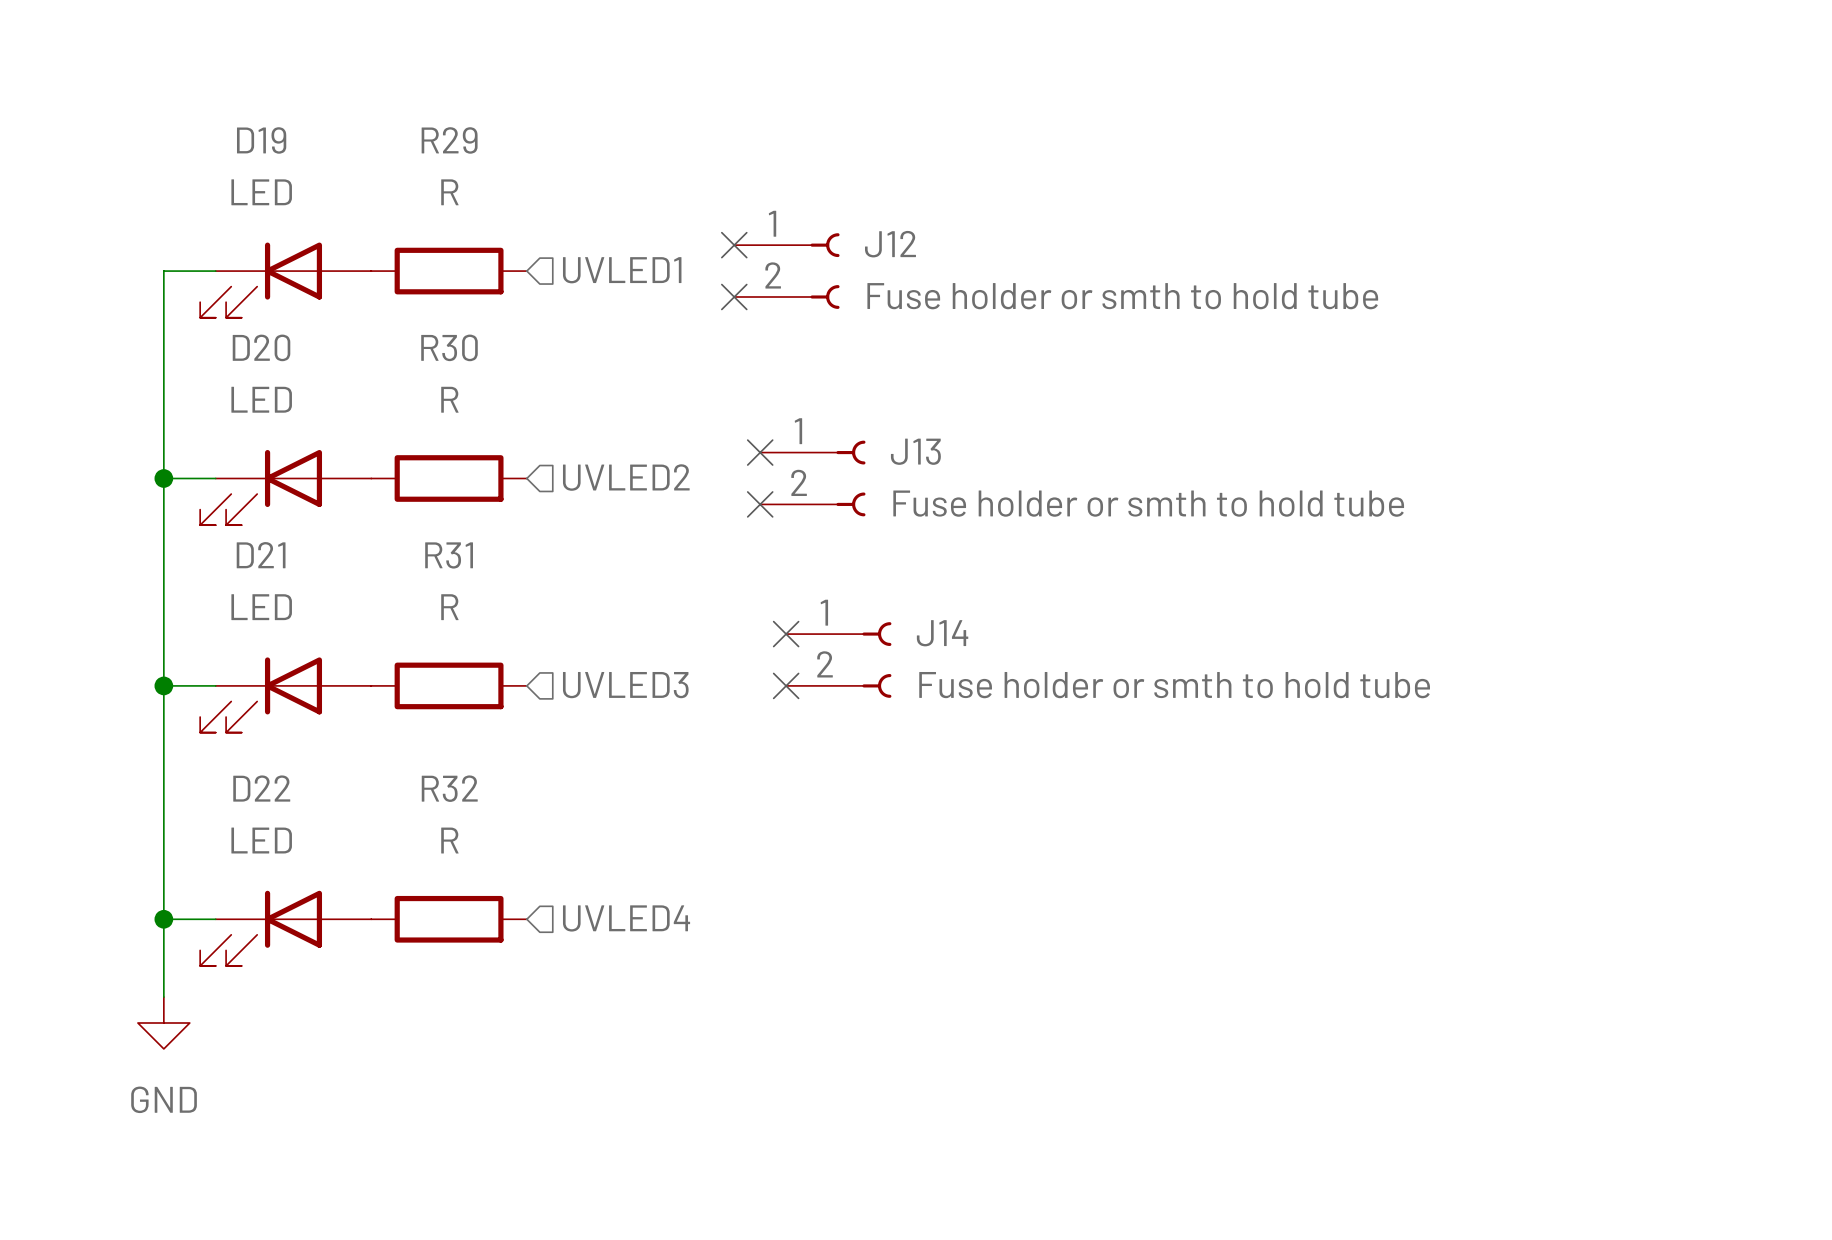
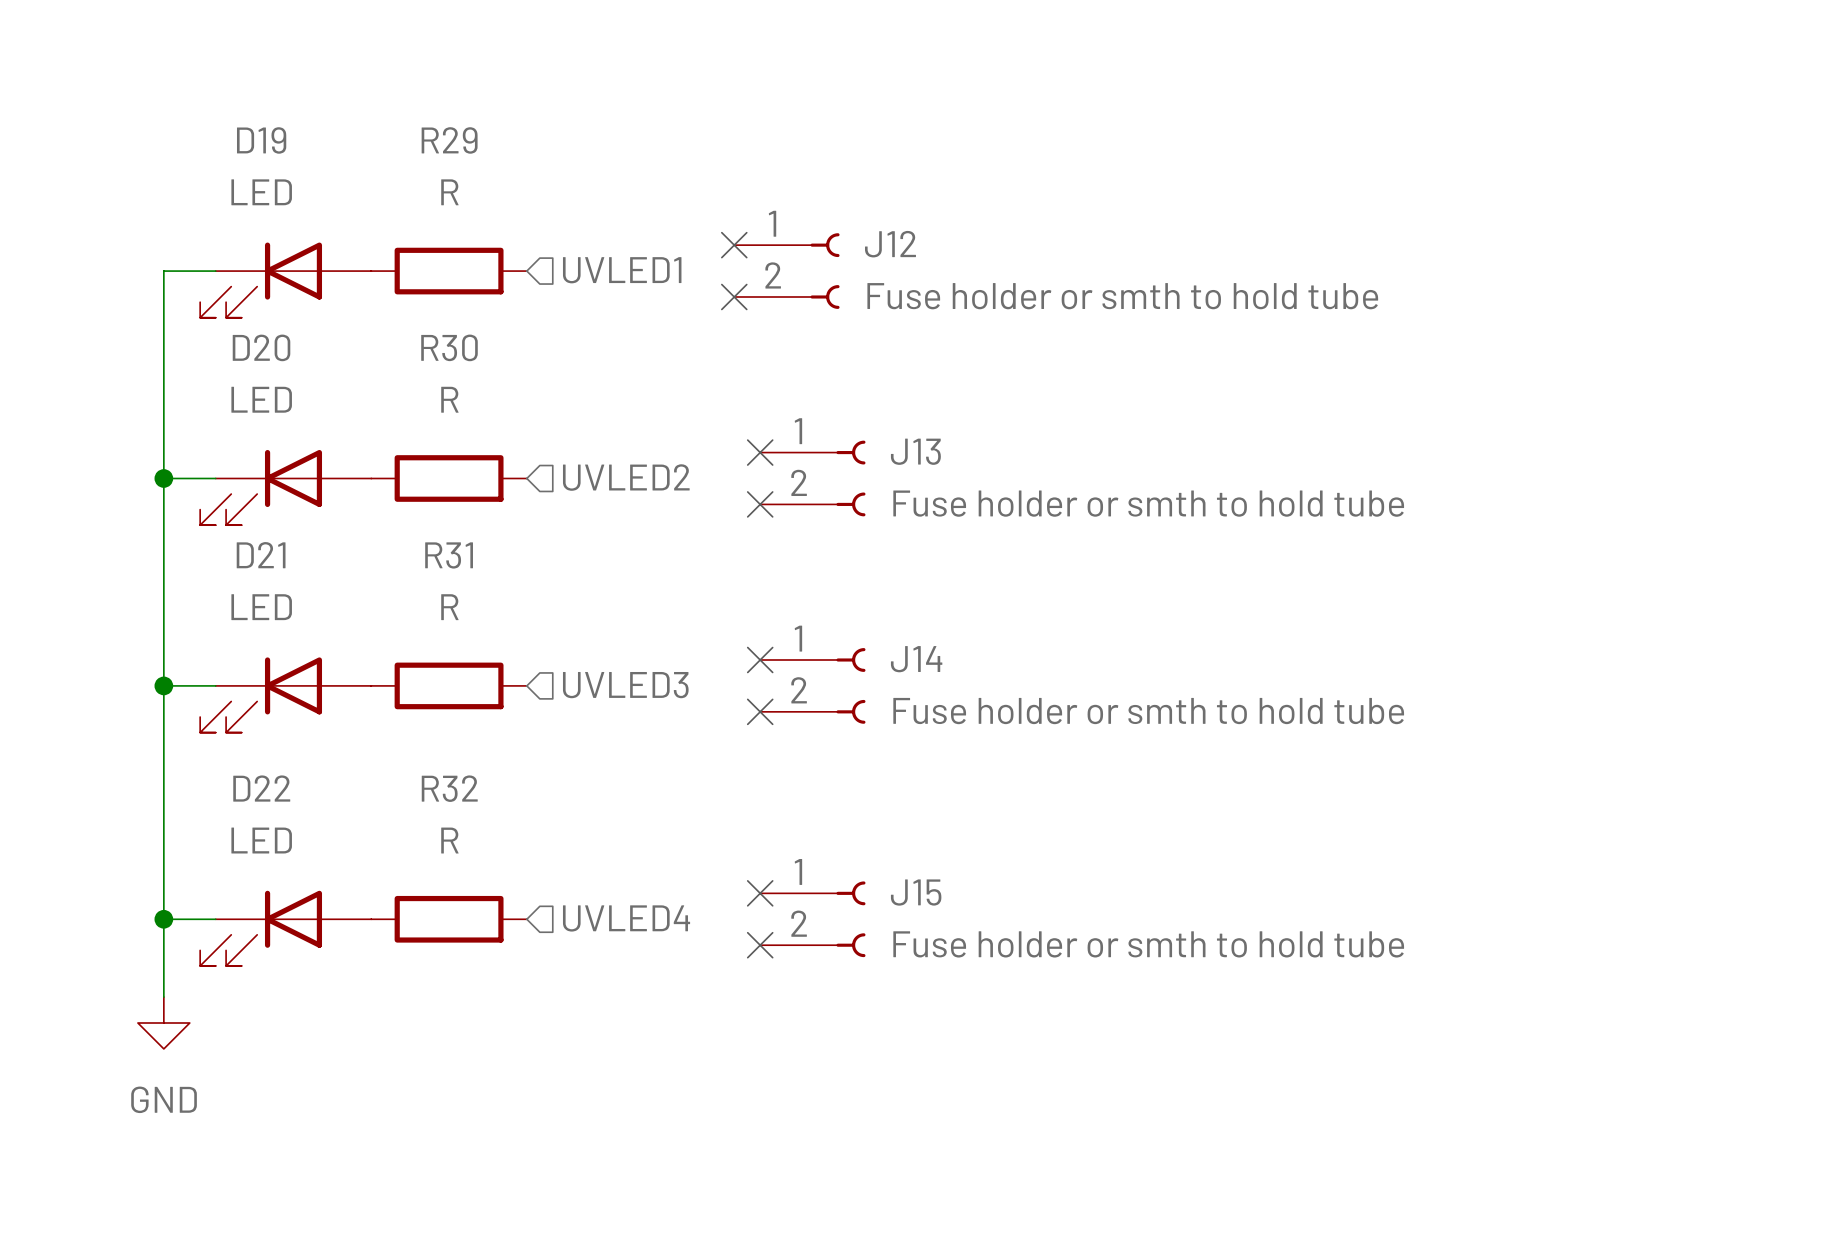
no-connect mark: (786, 634) -> none
no-connect mark: none -> (760, 659)
J14 position: (838, 659) -> (812, 685)
no-connect mark: (786, 685) -> none
no-connect mark: none -> (760, 711)
no-connect mark: none -> (760, 893)
J15: none -> Fuse holder or smth to hold tube (812, 919)
no-connect mark: none -> (760, 945)

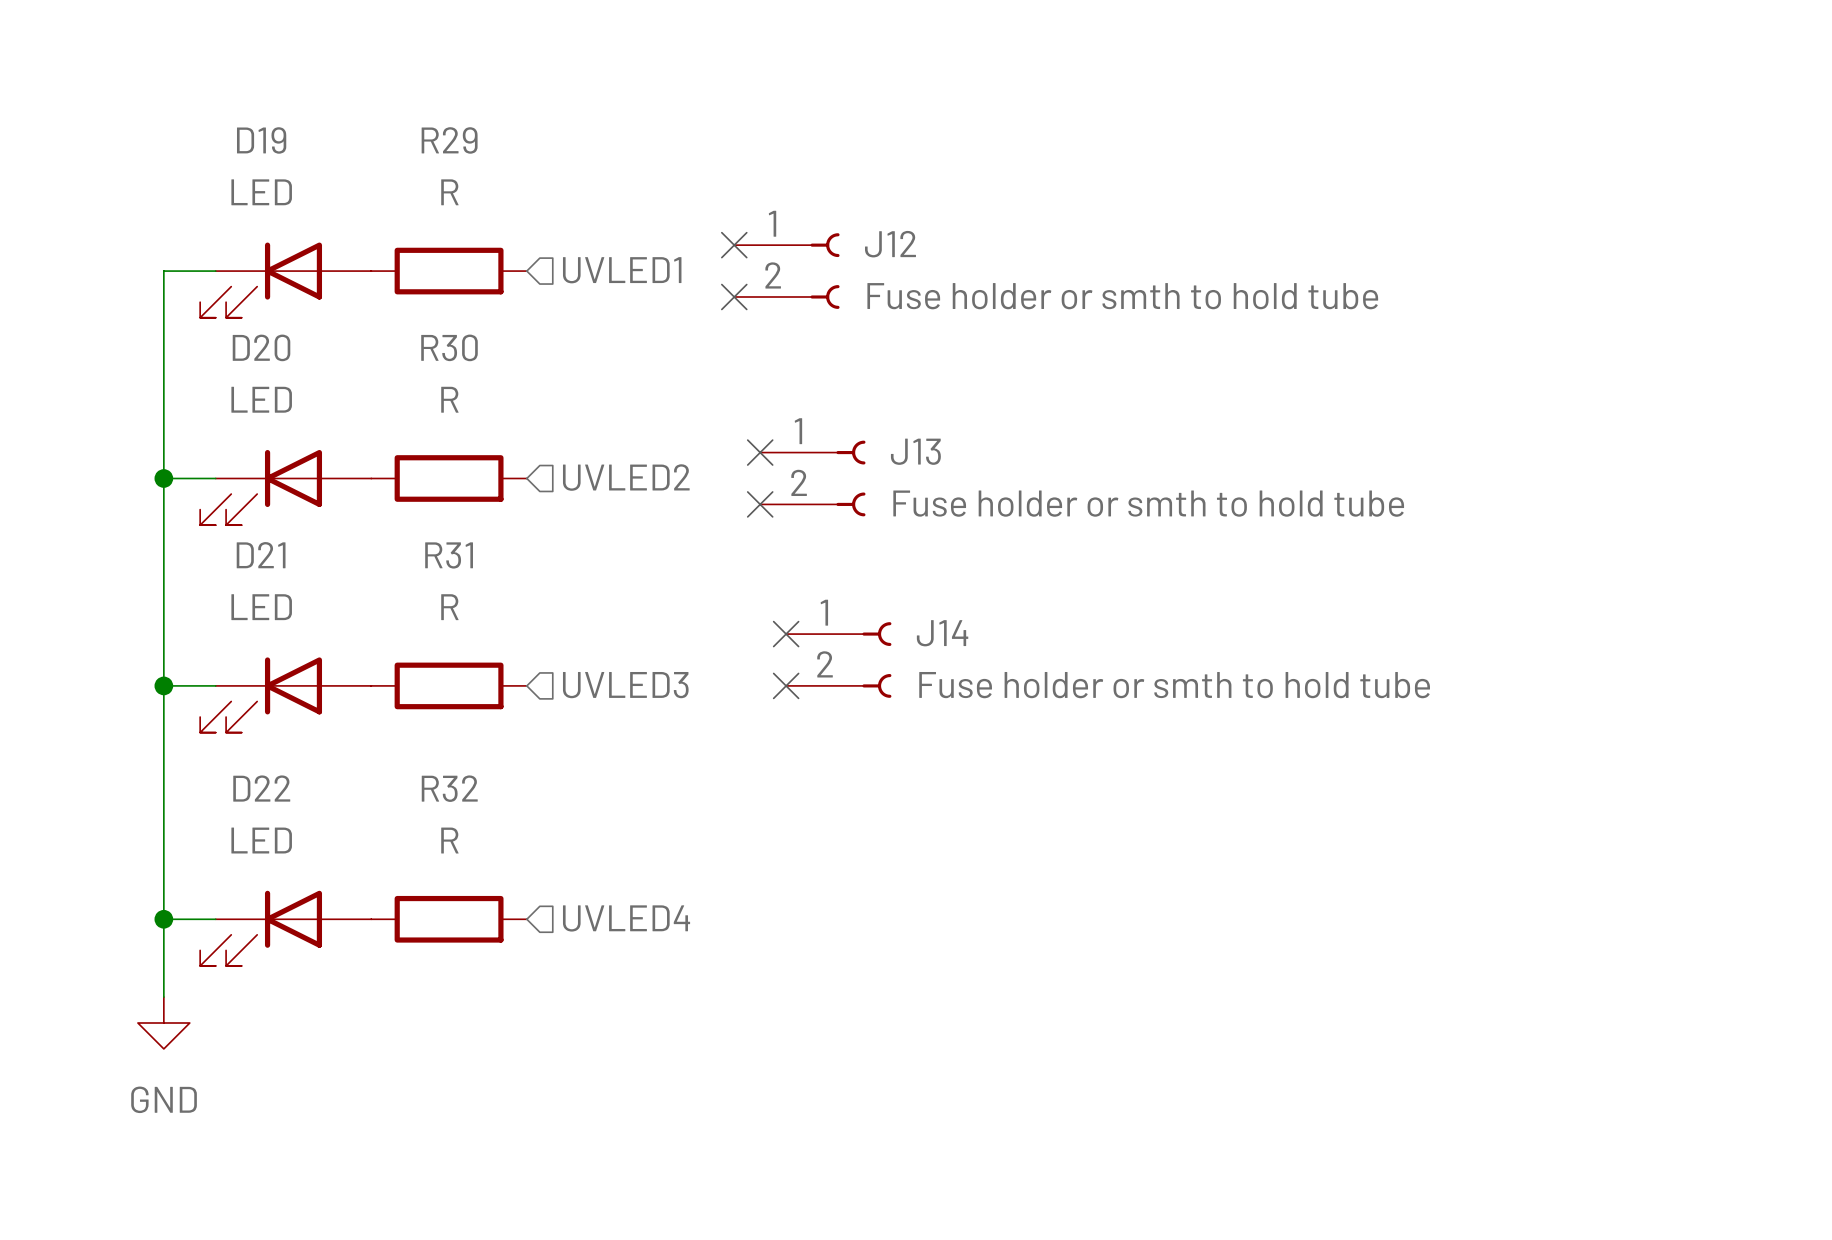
no-connect mark: none -> (786, 634)
no-connect mark: (760, 659) -> none
no-connect mark: none -> (786, 685)
J14 position: (812, 685) -> (838, 659)
no-connect mark: (760, 711) -> none
no-connect mark: (760, 893) -> none
J15: Fuse holder or smth to hold tube (812, 919) -> none
no-connect mark: (760, 945) -> none

